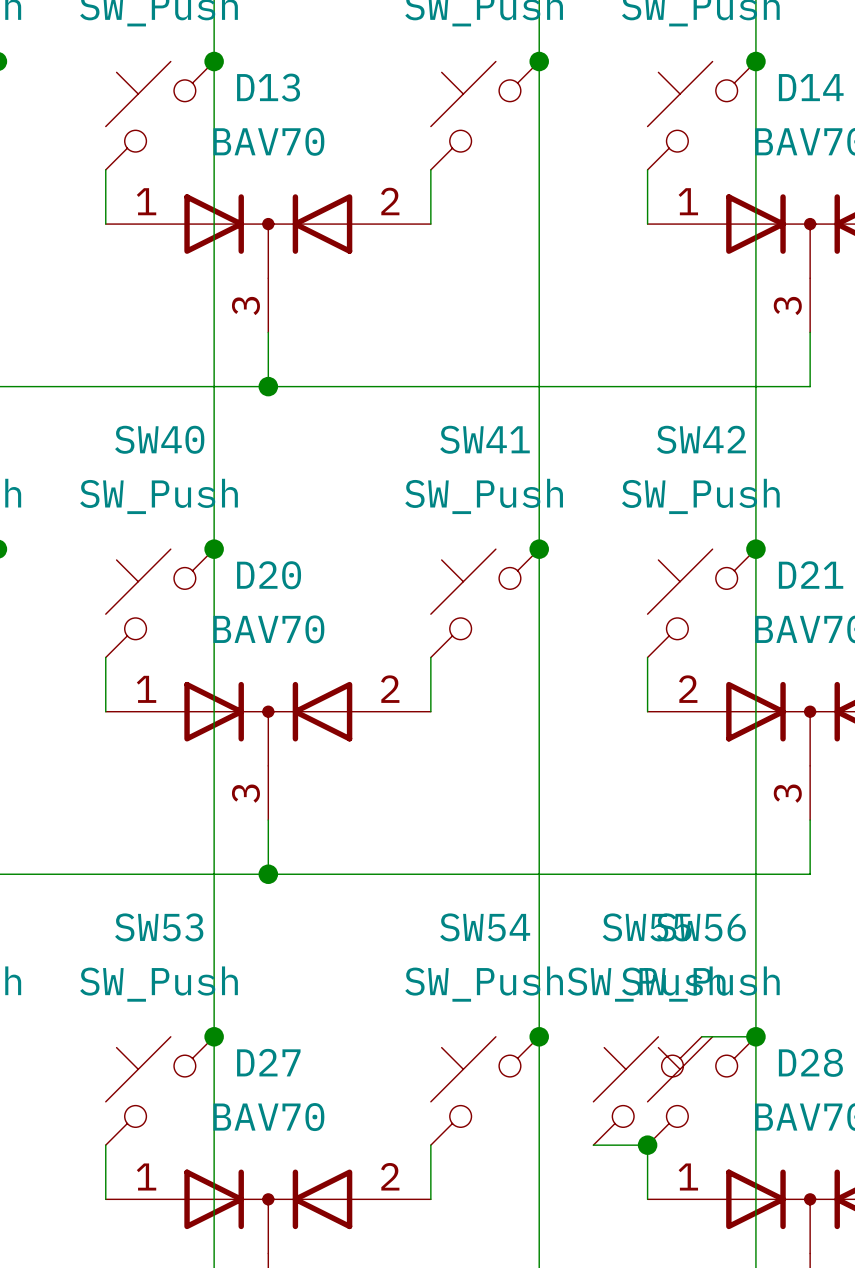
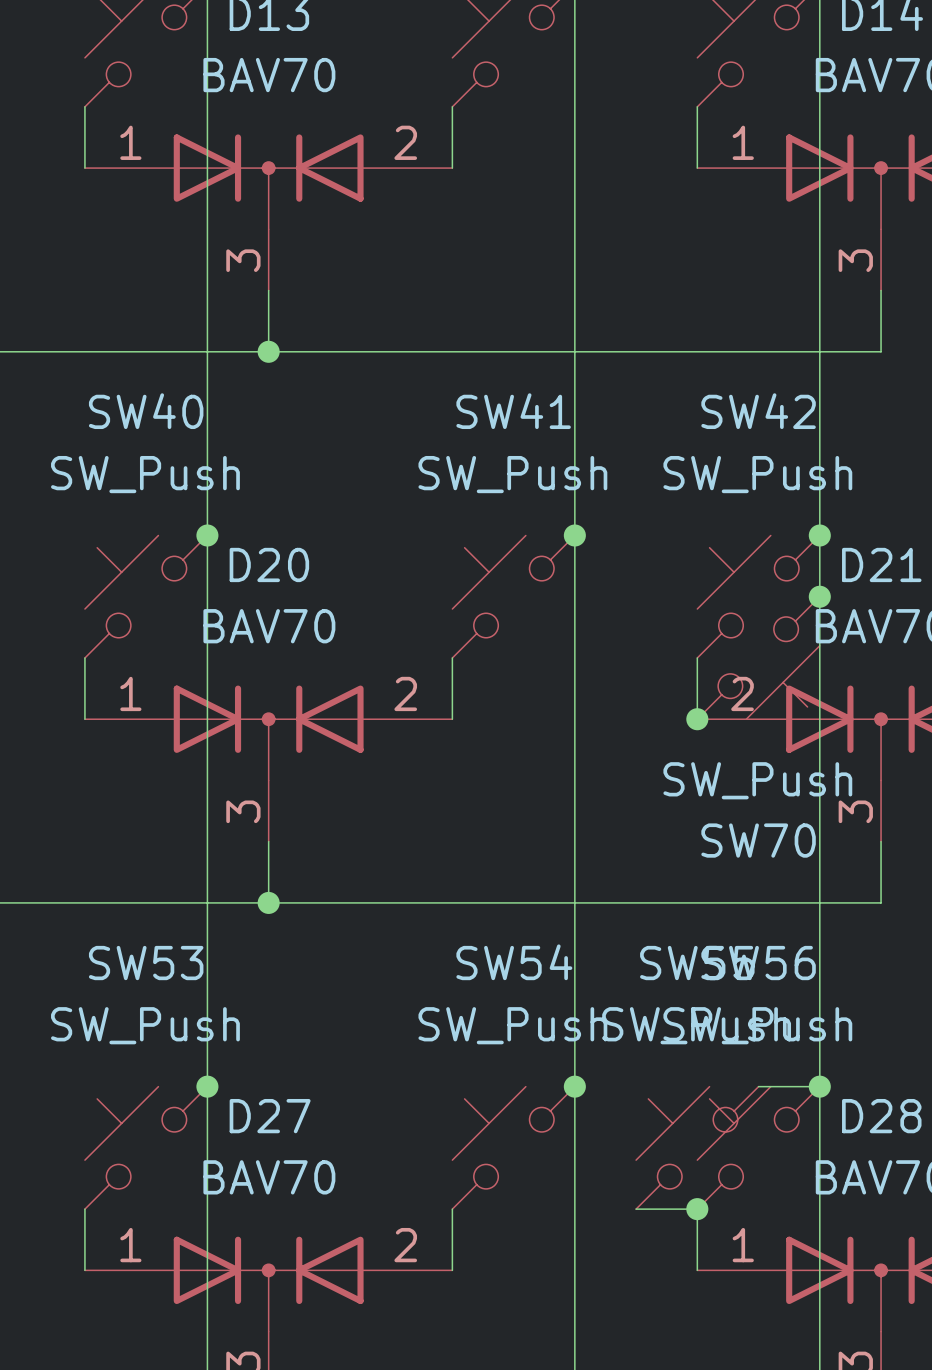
junction: none -> (819, 596)
SW70: none -> SW_Push (758, 657)
junction: none -> (697, 719)

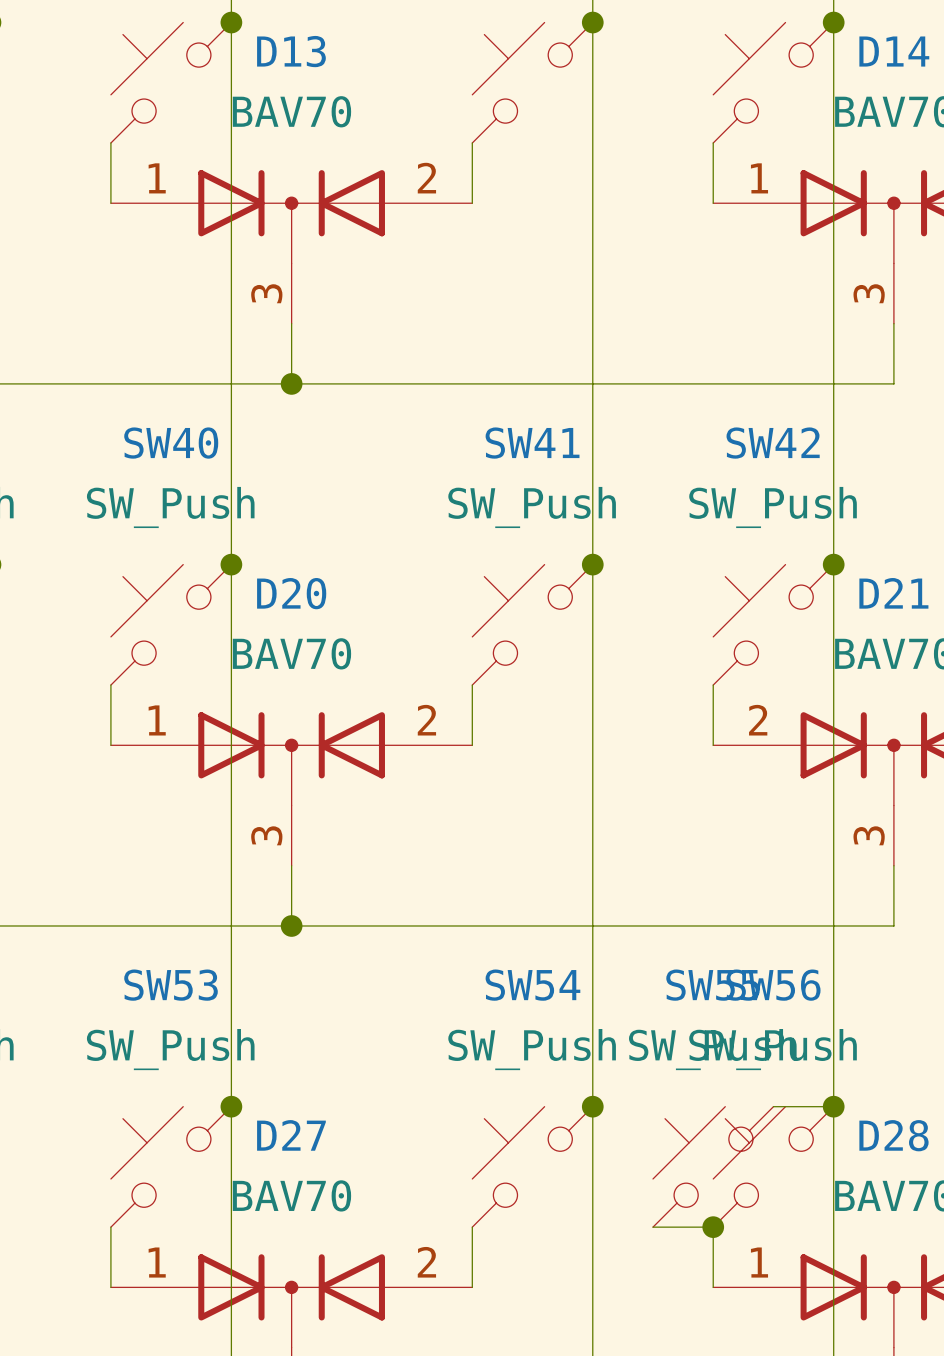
junction: (819, 596) -> none
SW70: SW_Push (758, 657) -> none
junction: (697, 719) -> none

